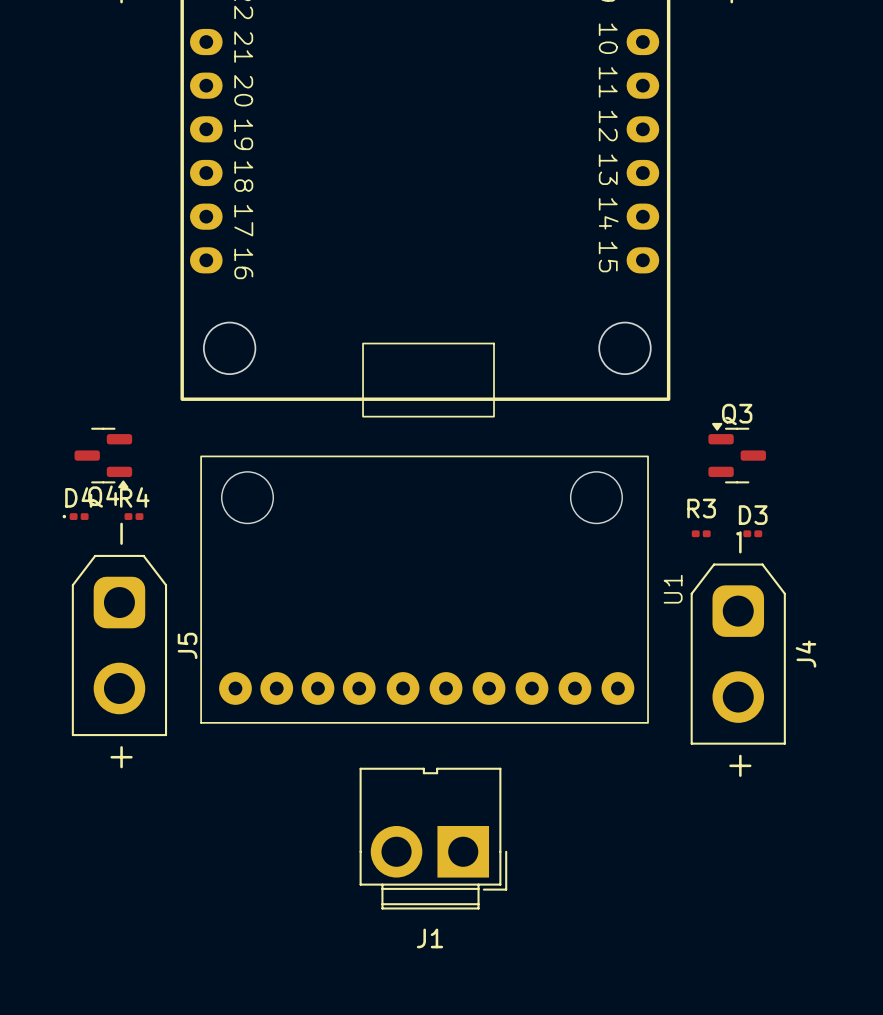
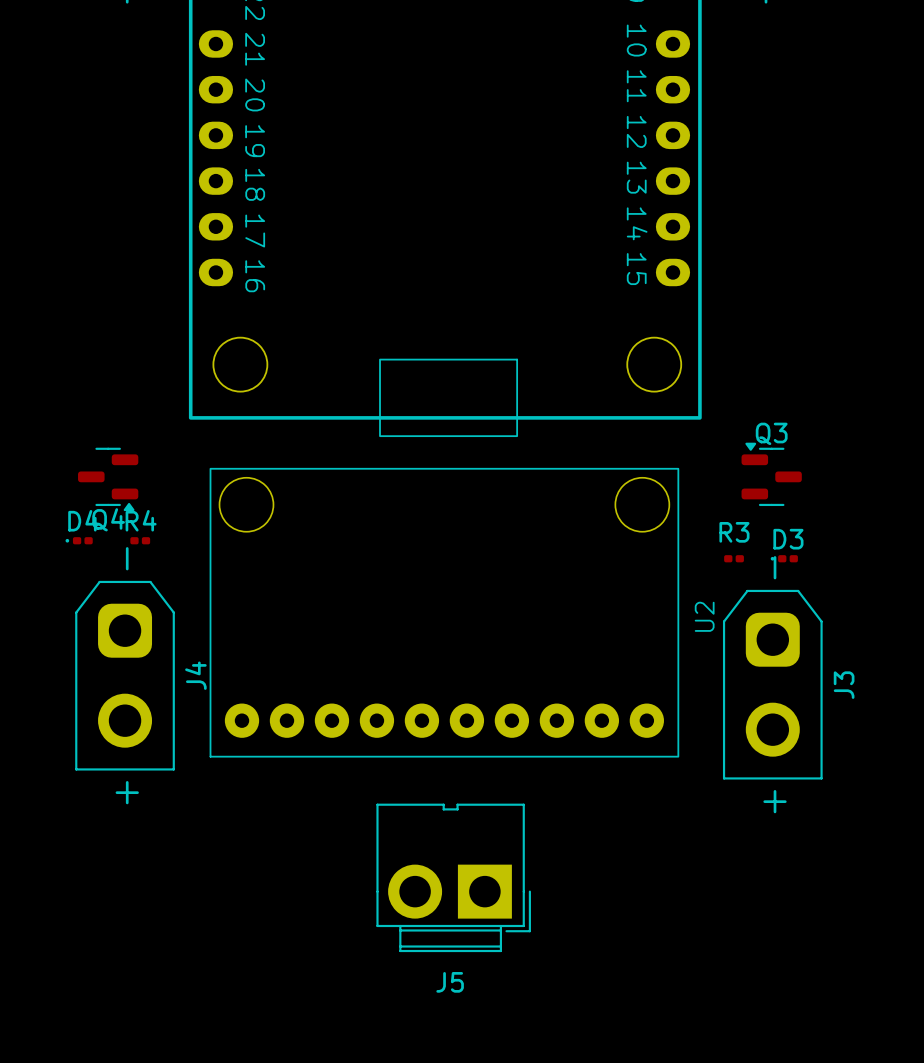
U2: none -> (444, 612)
U1: (424, 589) -> none
J5 name: J5 (187, 645) -> J4 (195, 675)
J4 name: J4 (805, 654) -> J3 (844, 685)
J1 name: J1 (429, 938) -> J5 (450, 982)

